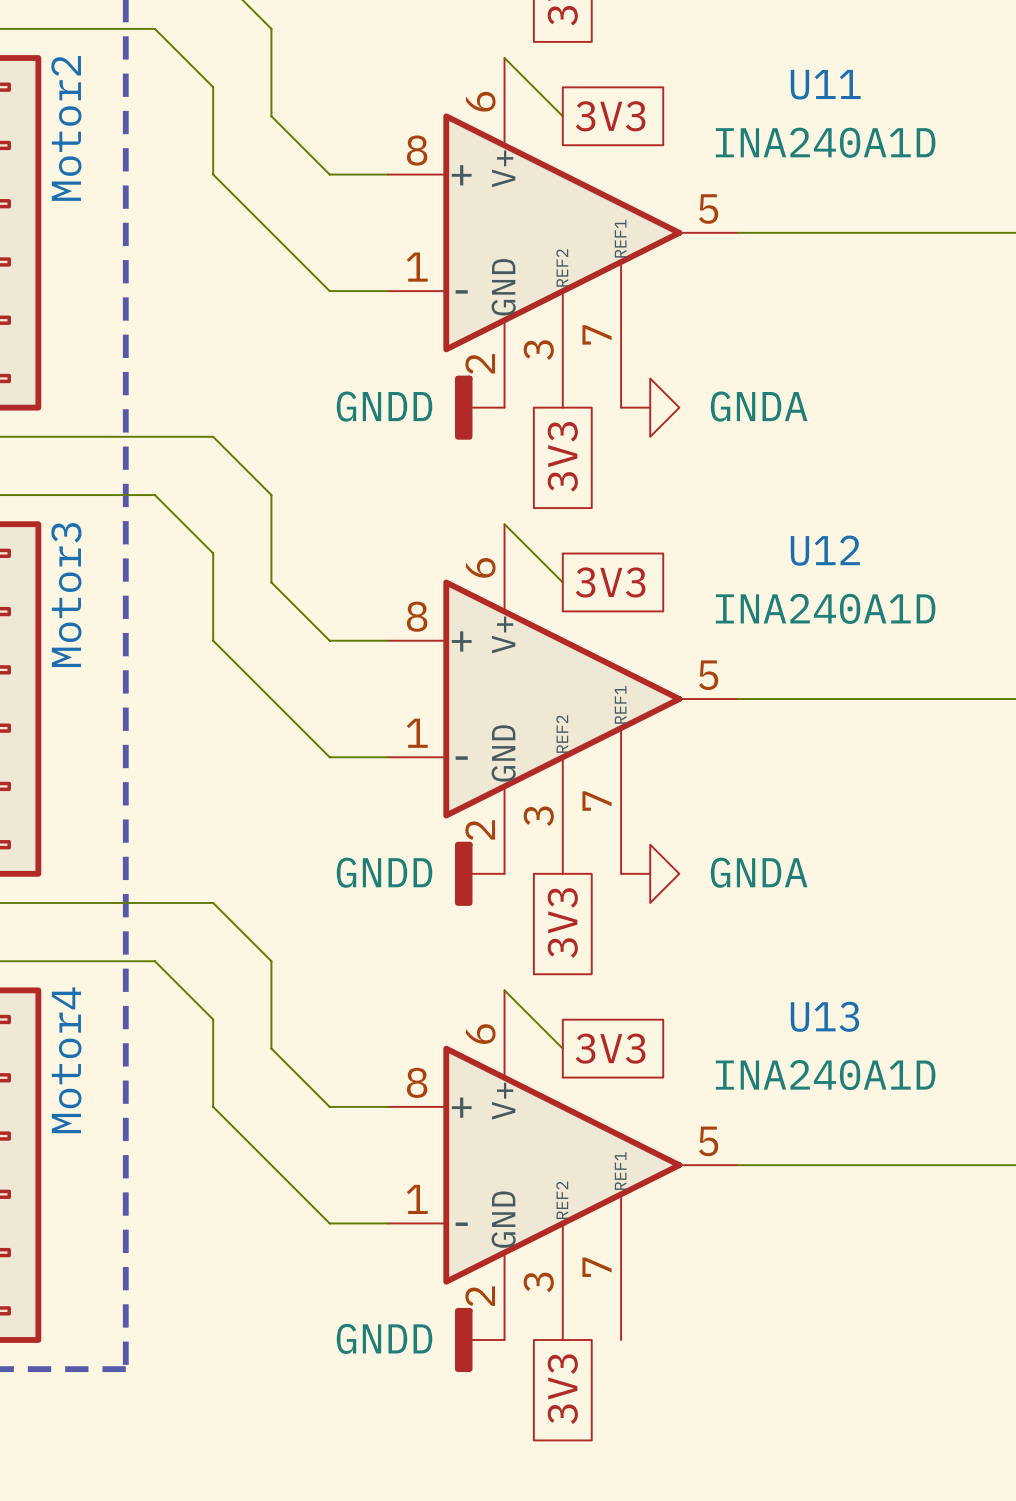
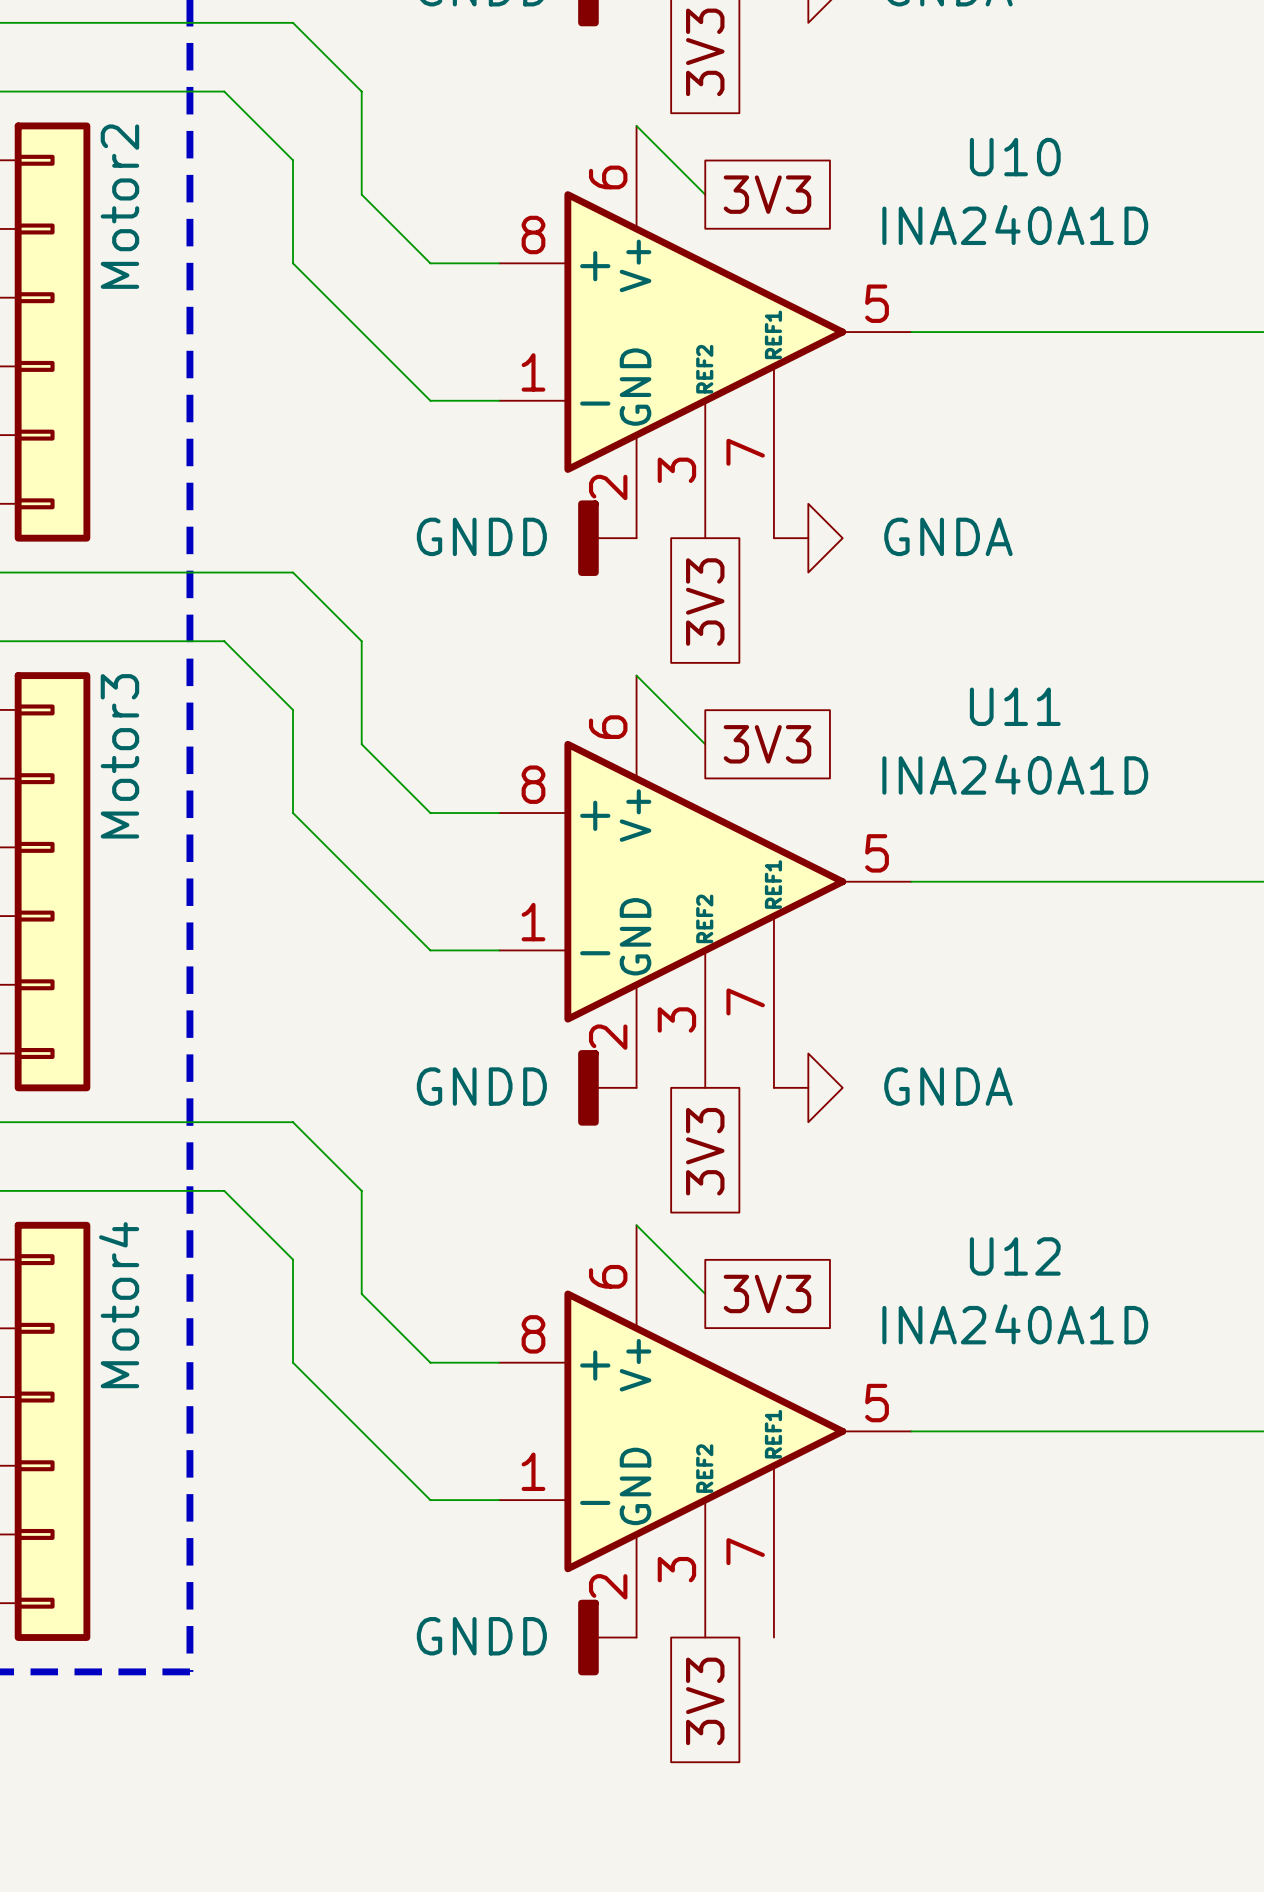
U11 name: U11 (825, 84) -> U10 (1015, 157)
U12 name: U12 (825, 550) -> U11 (1015, 706)
U13 name: U13 (824, 1016) -> U12 (1015, 1256)

